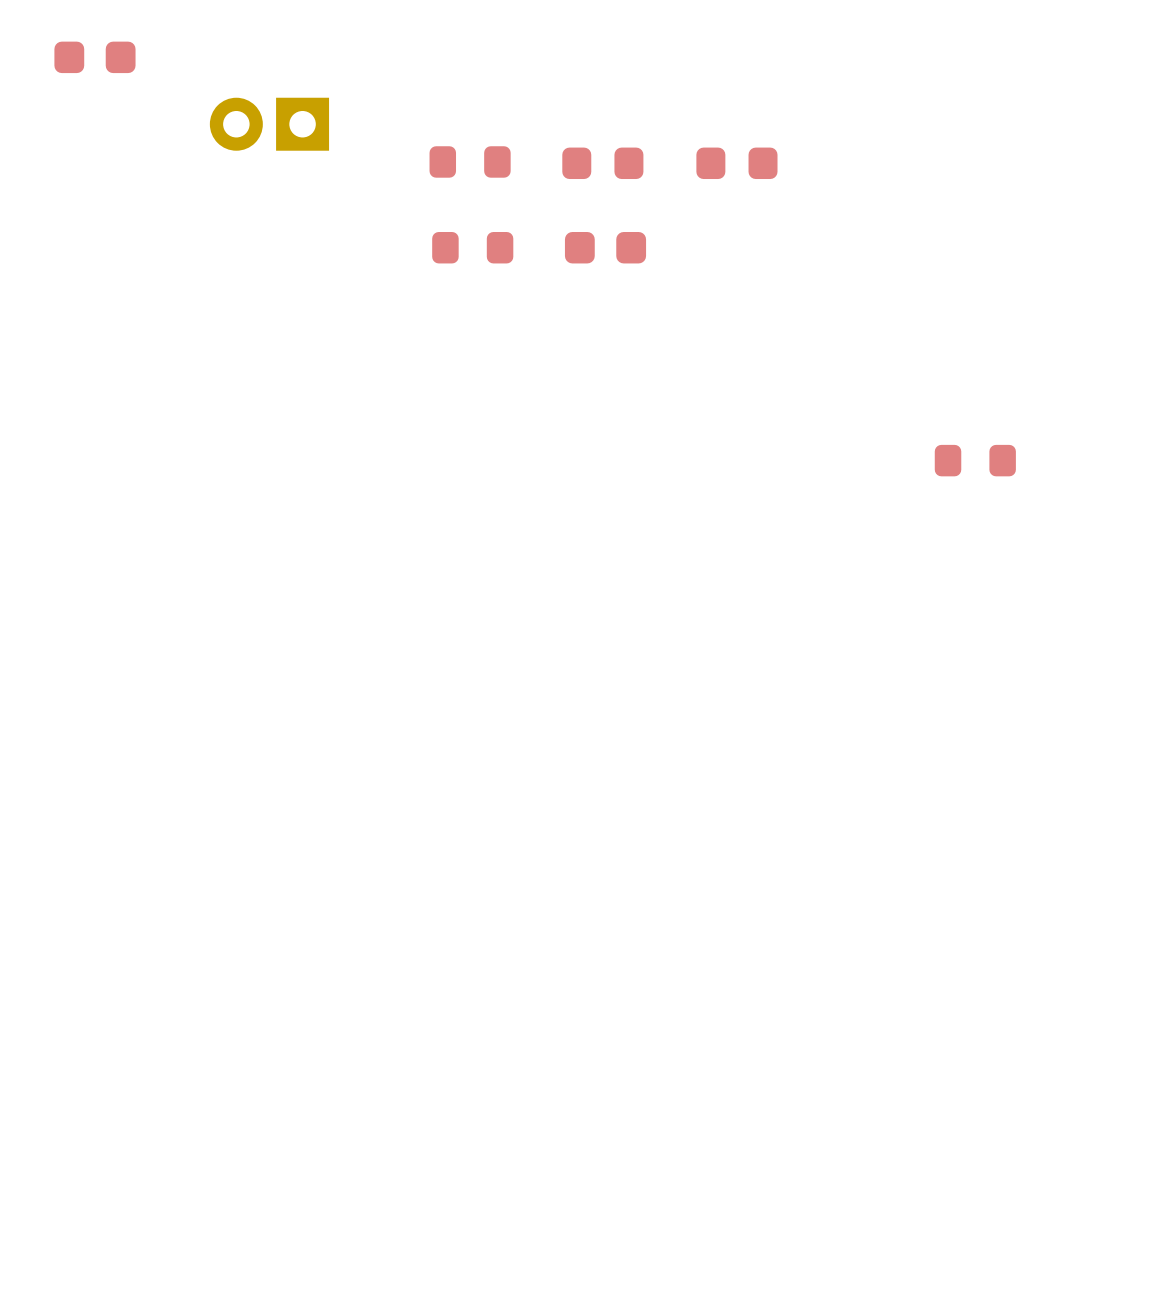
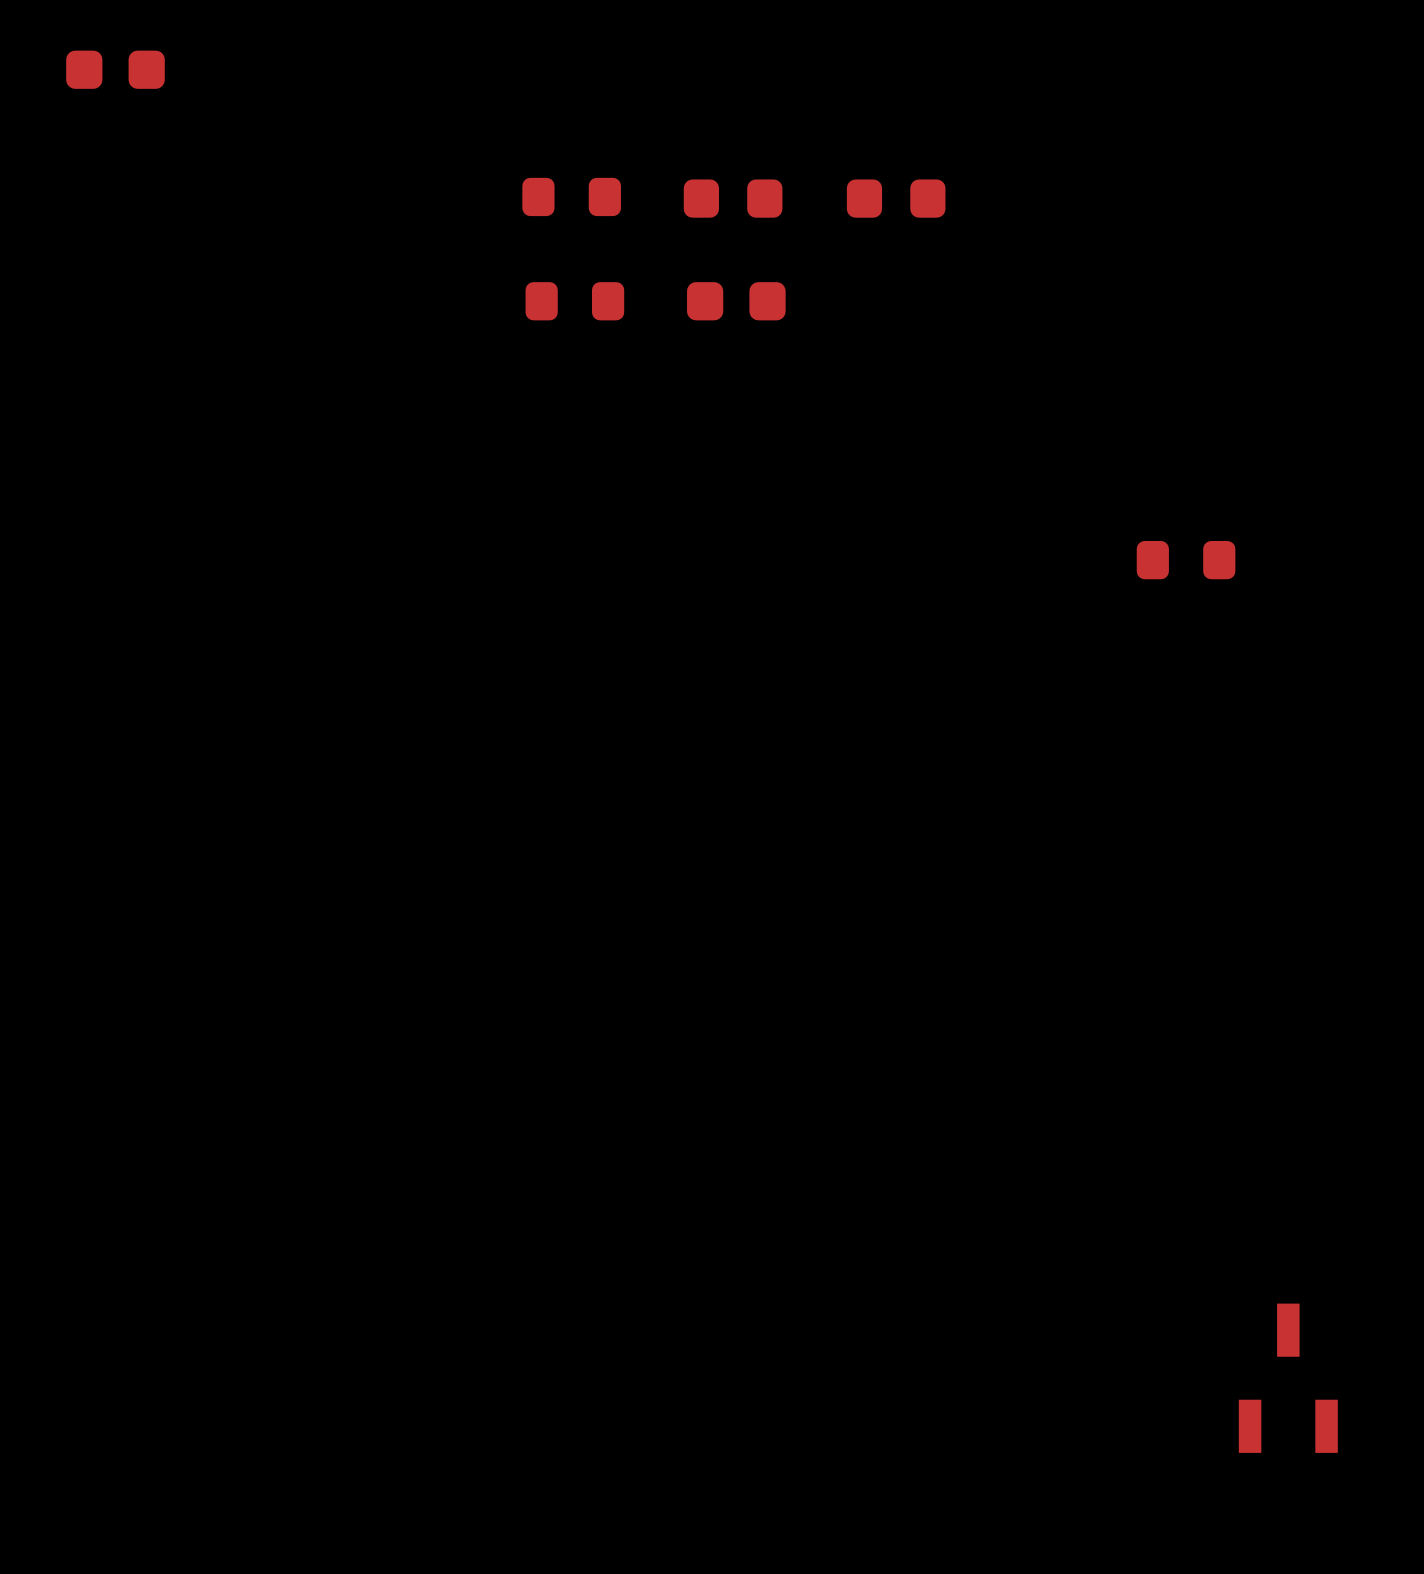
part: (269, 124) -> none
part: none -> (1288, 1378)

